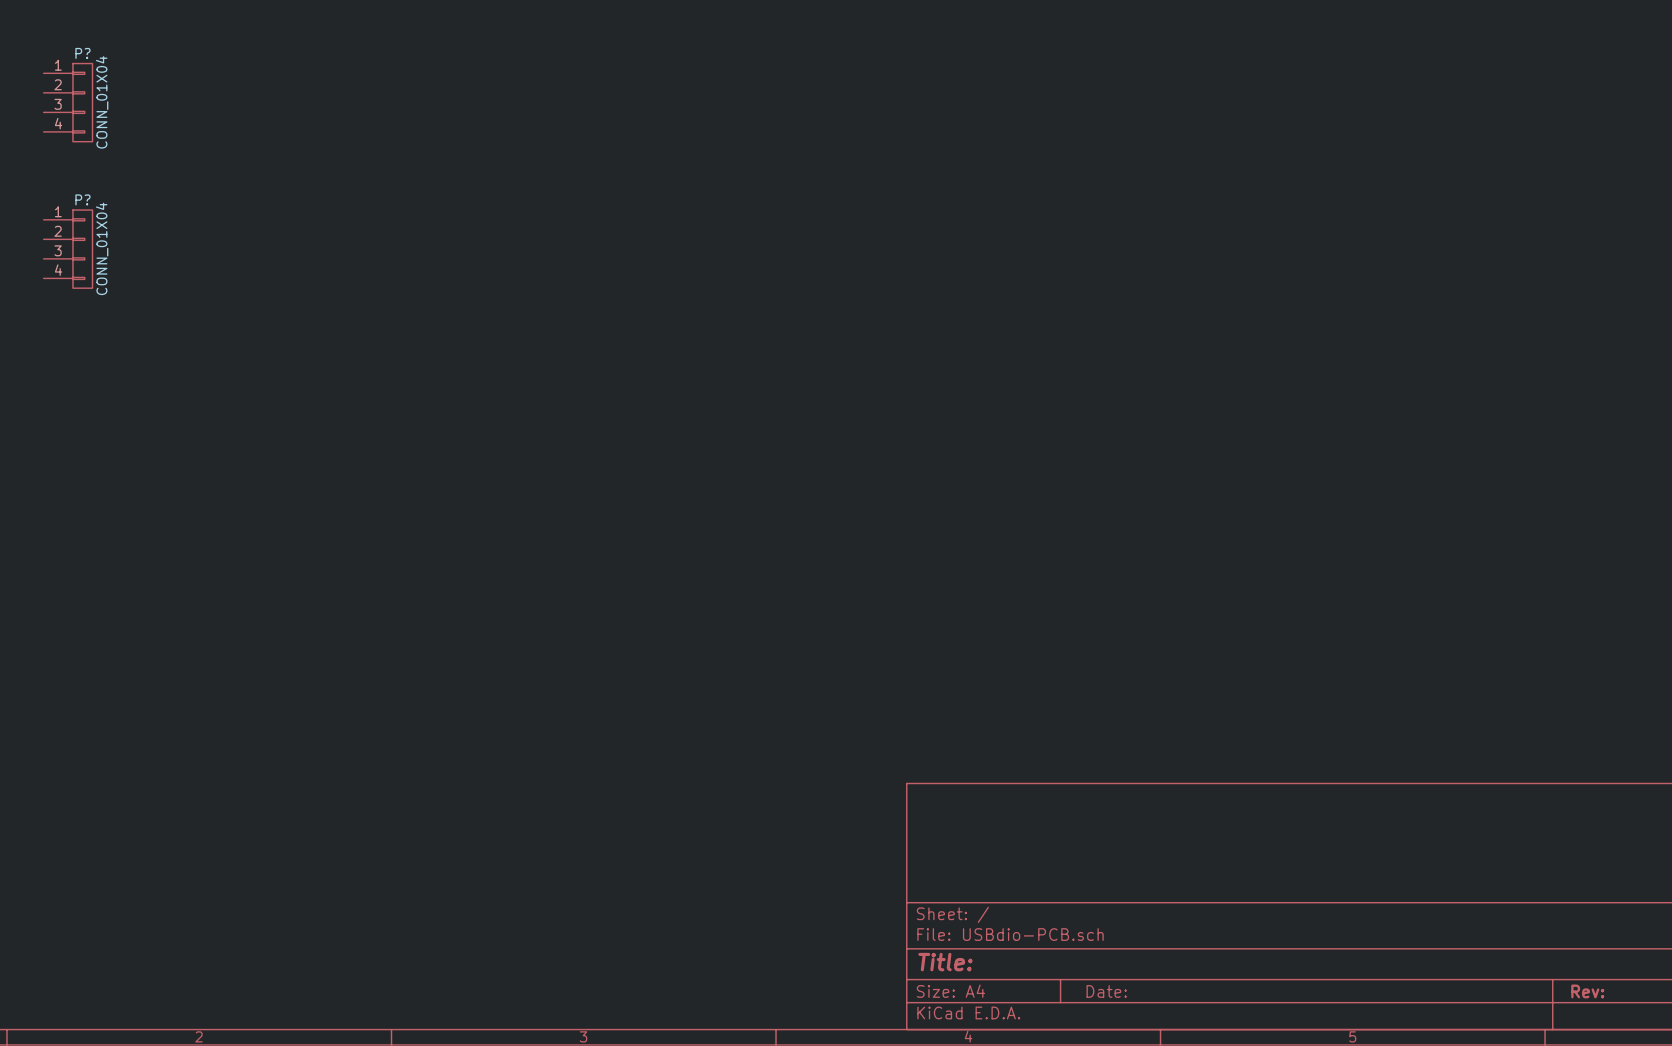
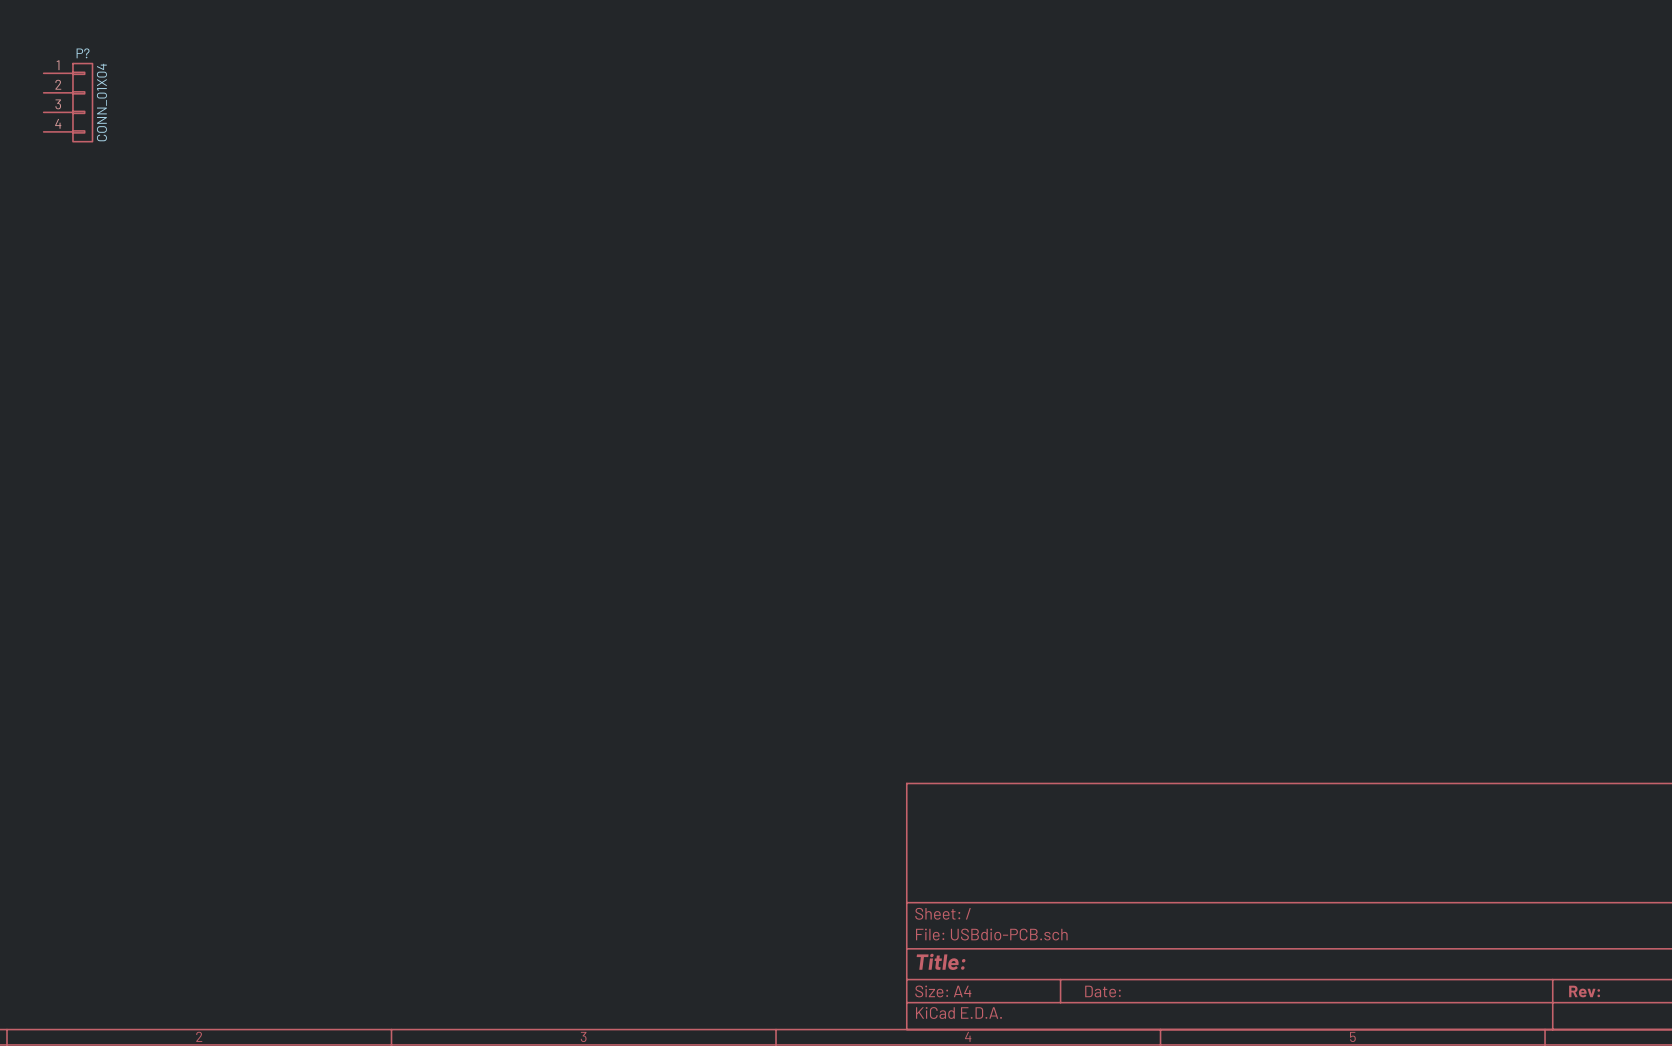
P?: CONN_01X04 (68, 249) -> none

